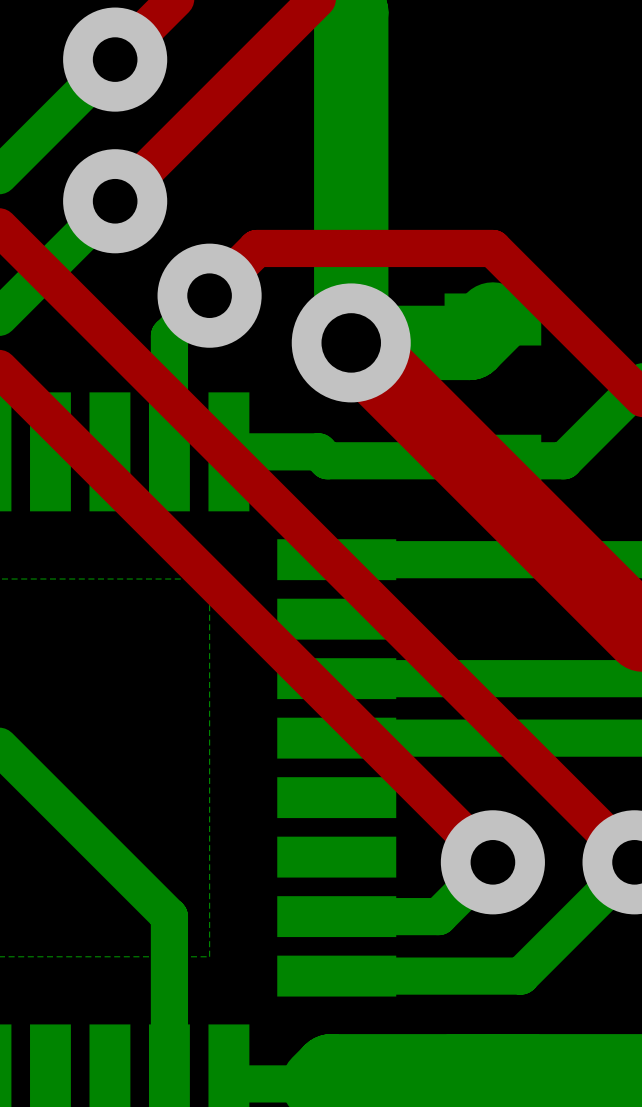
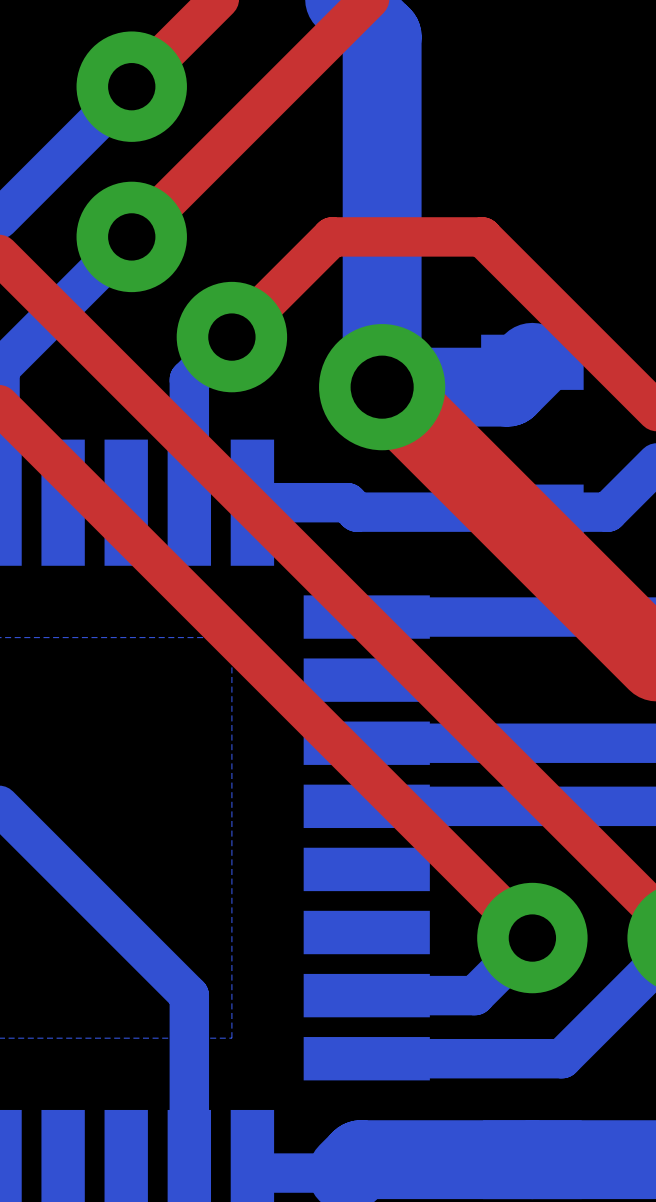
top track: (256, 248) (492, 248) -> (281, 286) (332, 236) (482, 236) (532, 286)

